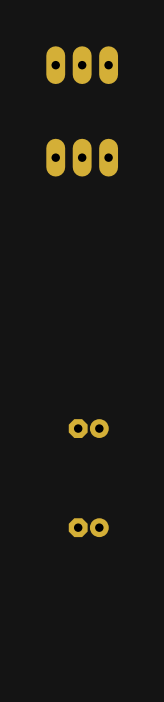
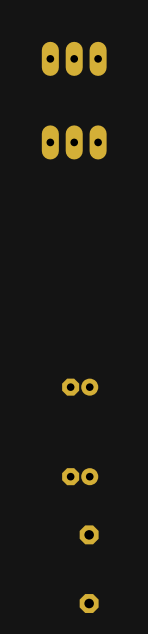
part: none -> (89, 534)
part: none -> (89, 603)

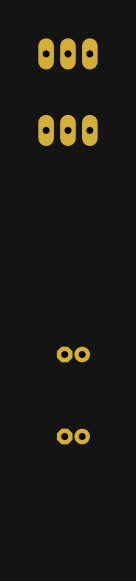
part: (89, 534) -> none
part: (89, 603) -> none

